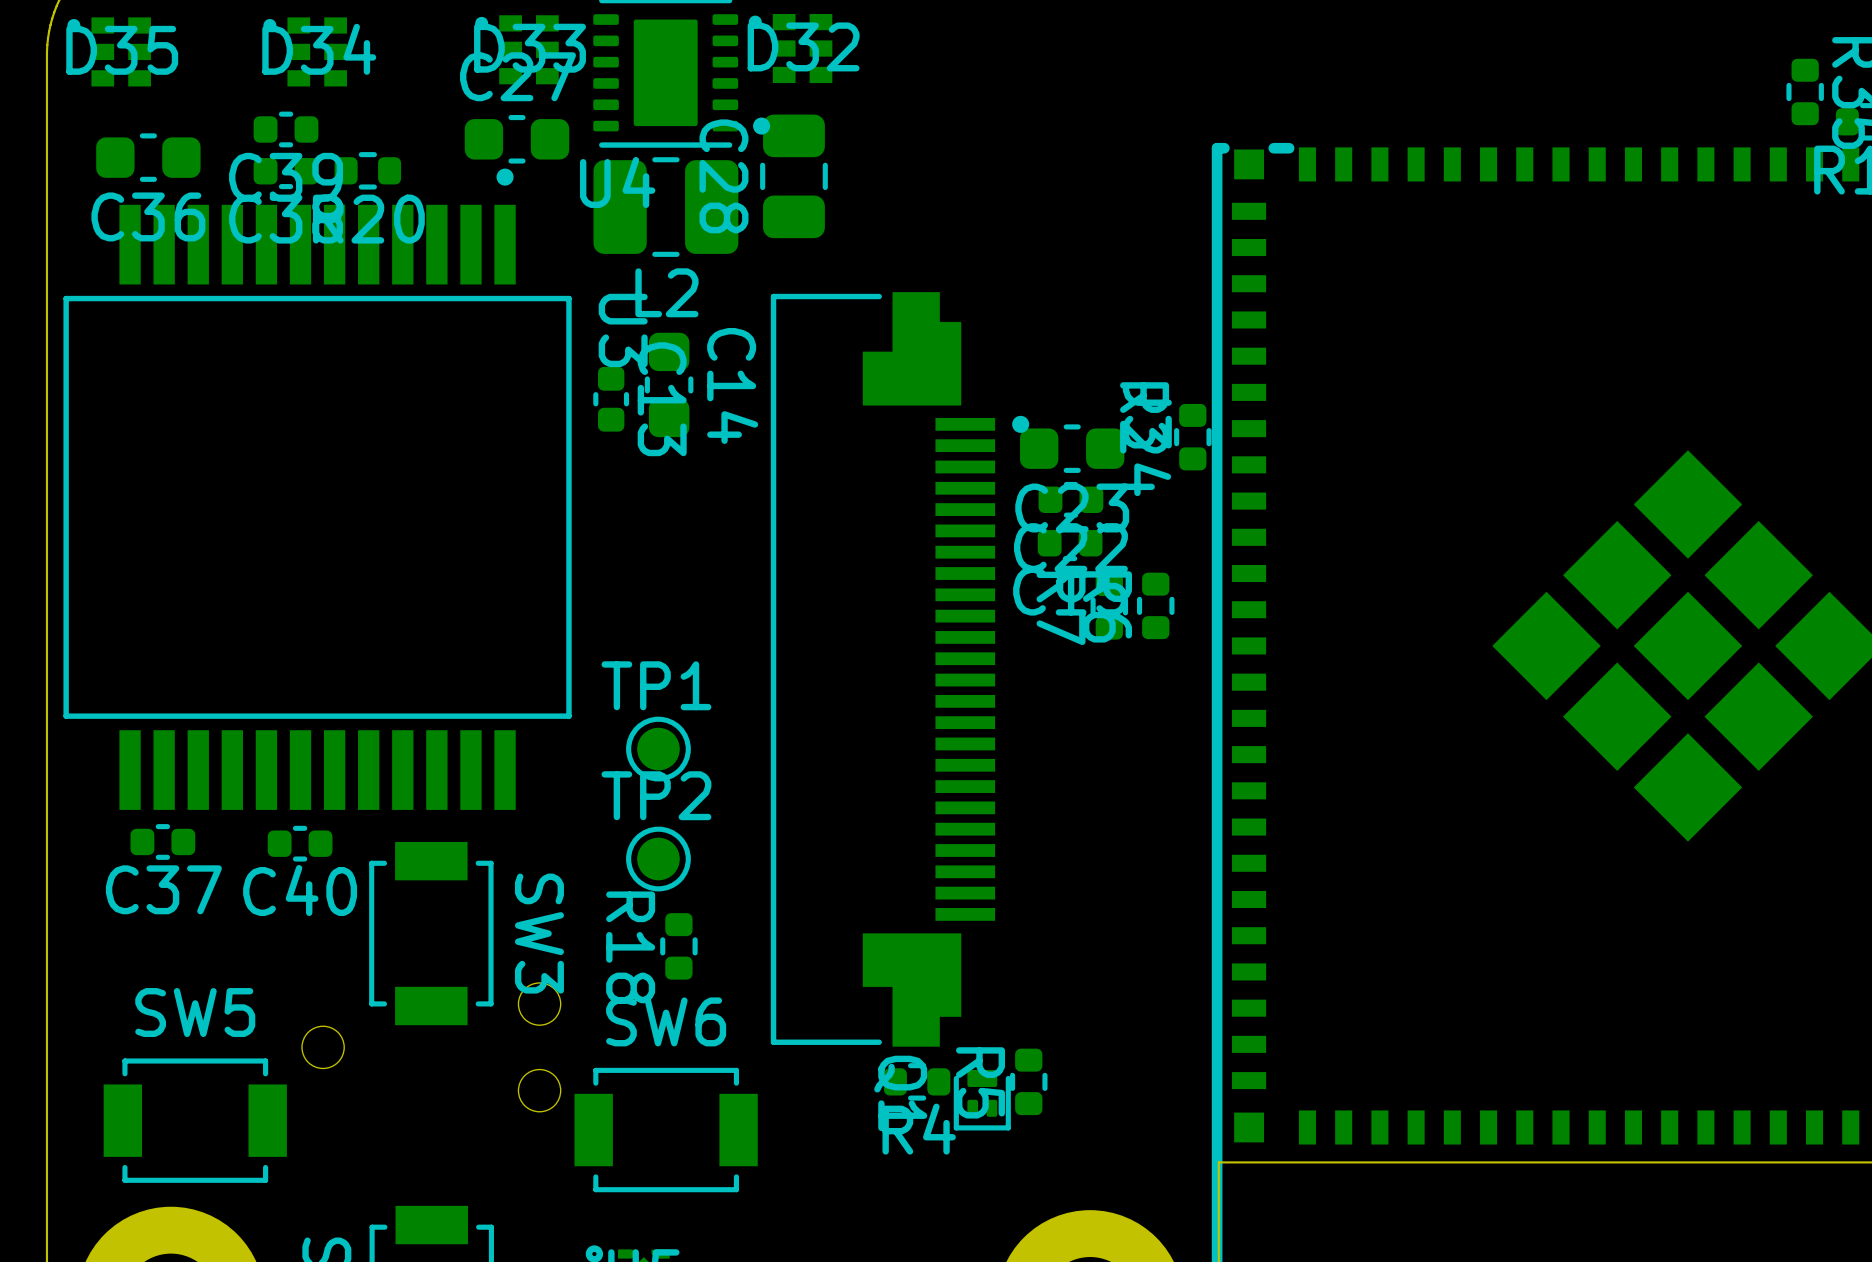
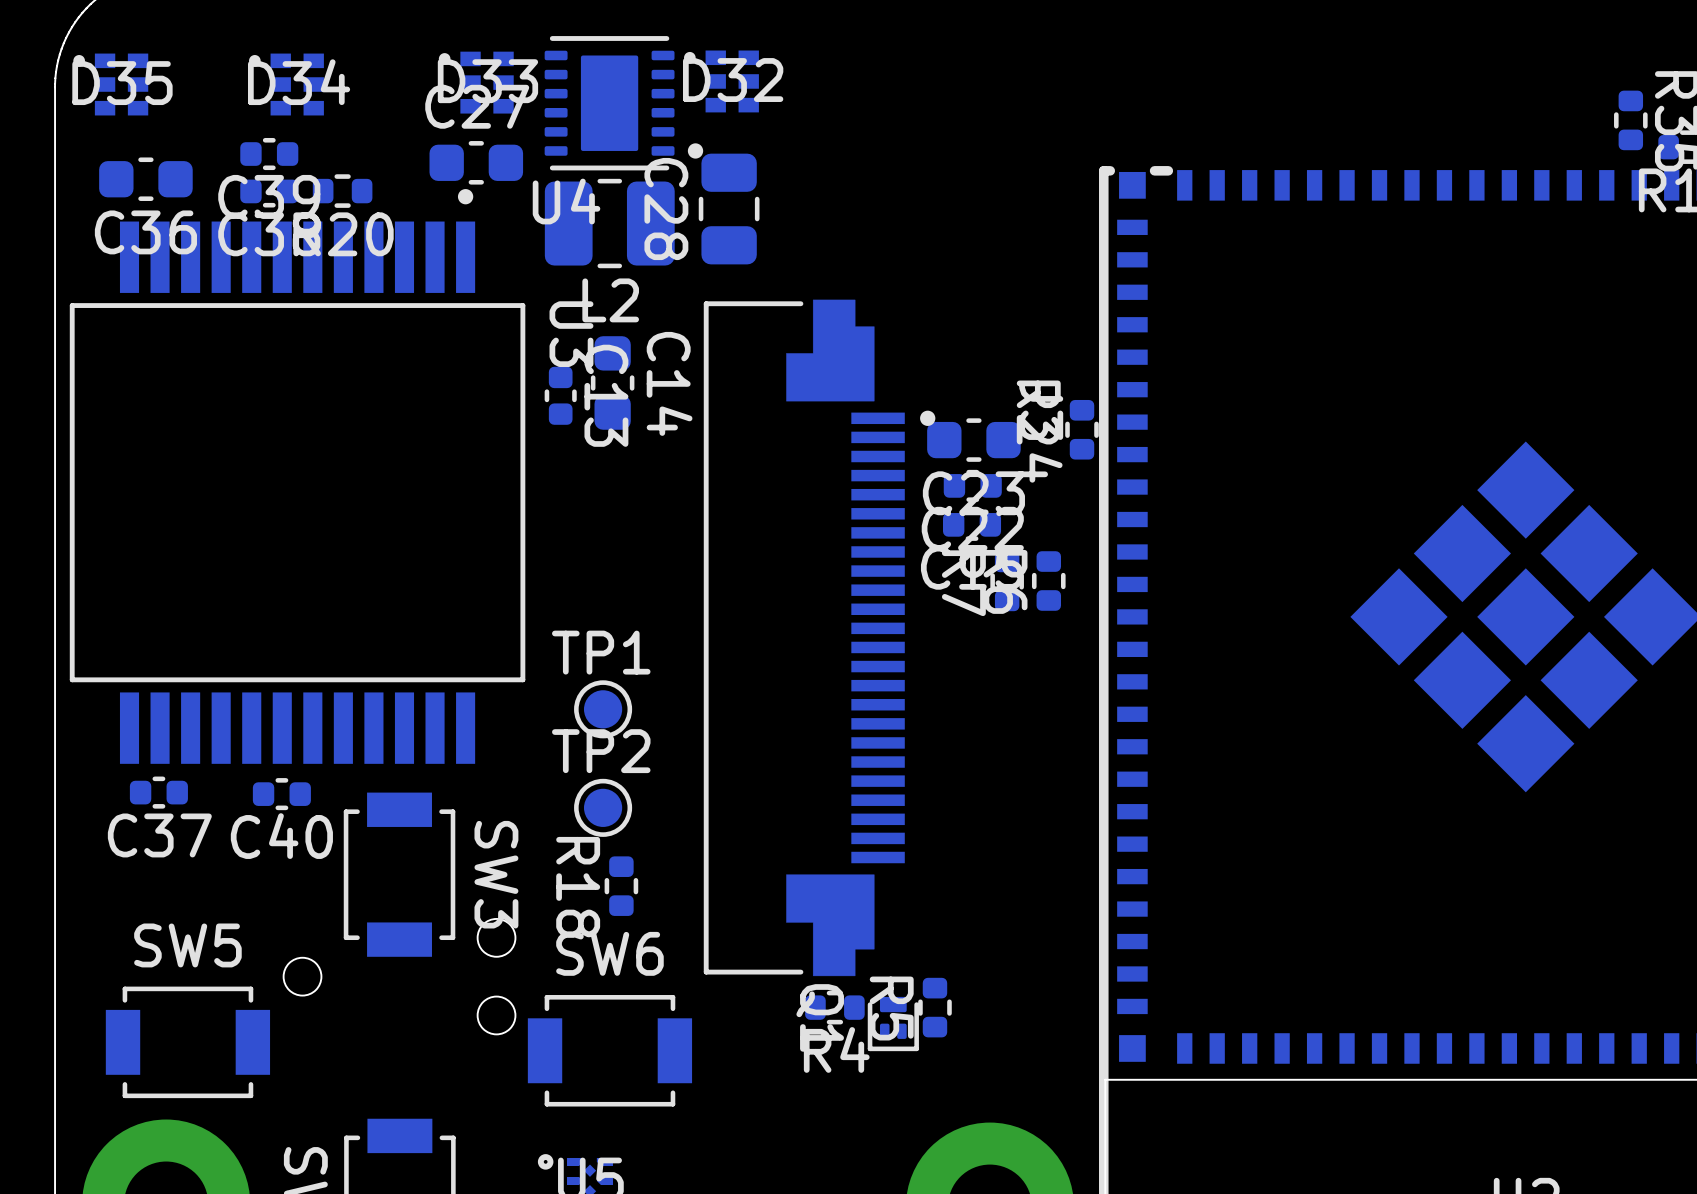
C28 position: (793, 176) -> (729, 209)

